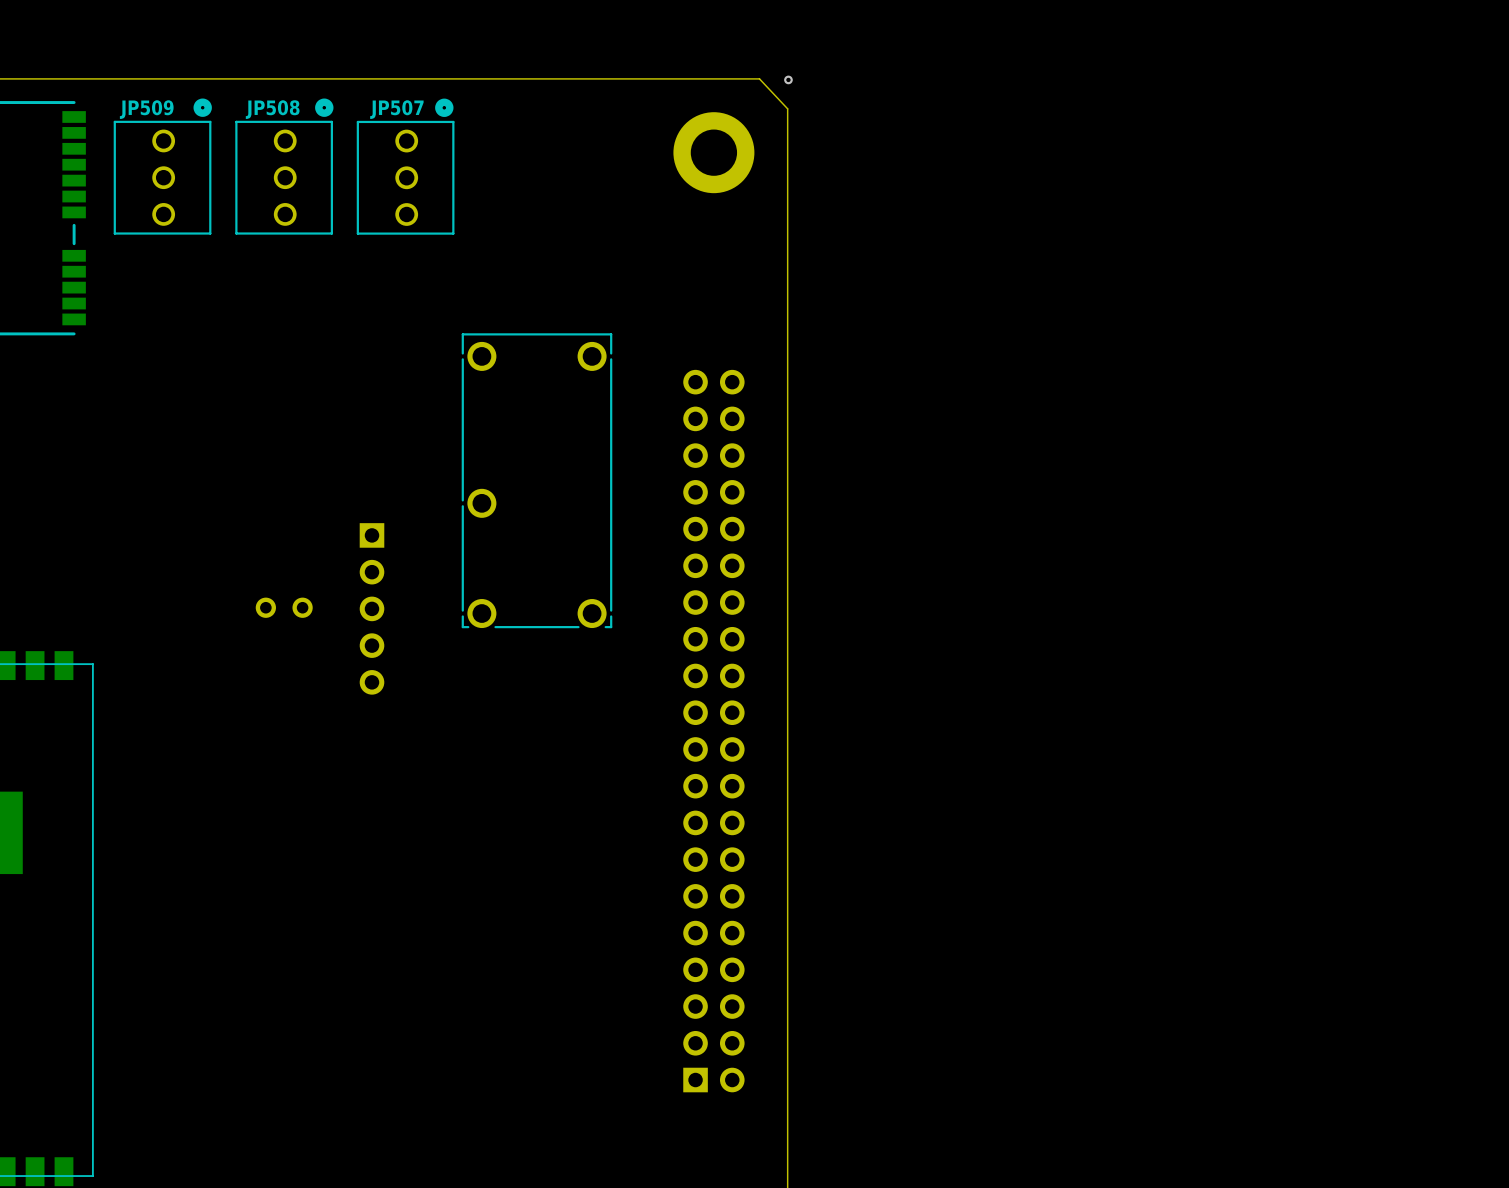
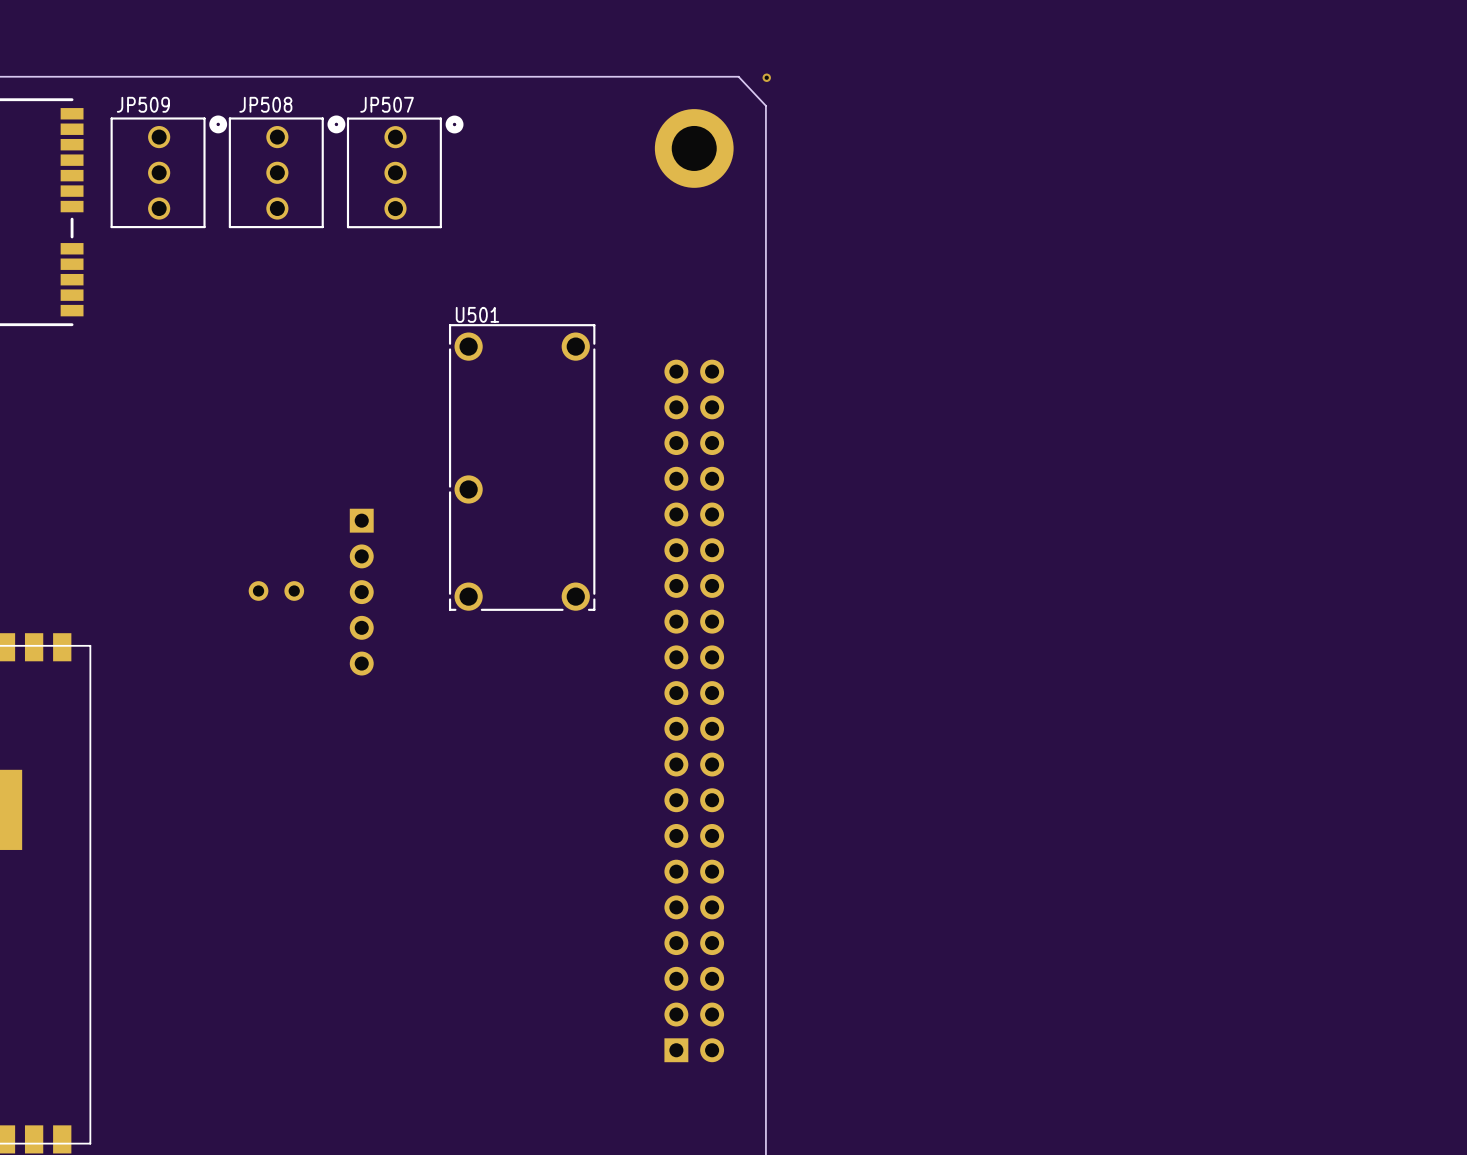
JP509 footprint: [113, 98, 212, 235] -> [110, 115, 228, 229]
JP508 footprint: [235, 98, 334, 235] -> [228, 115, 346, 229]
JP507 footprint: [356, 98, 455, 235] -> [346, 115, 464, 229]
U501 name: none -> U501 (477, 314)

